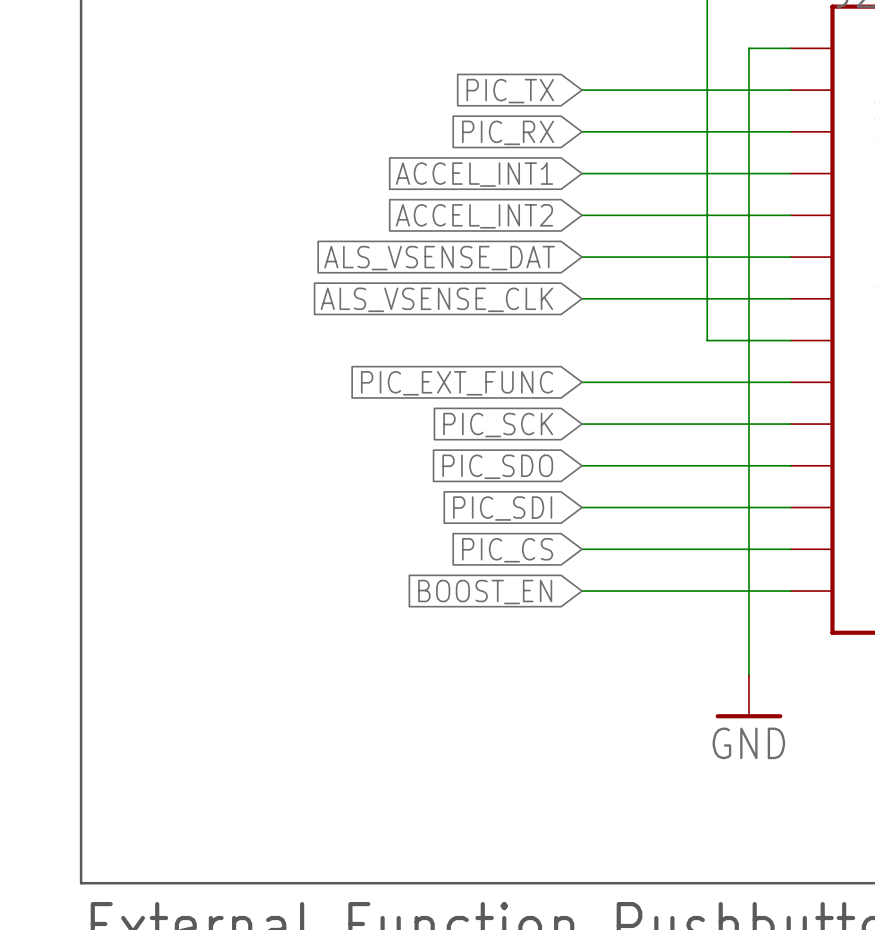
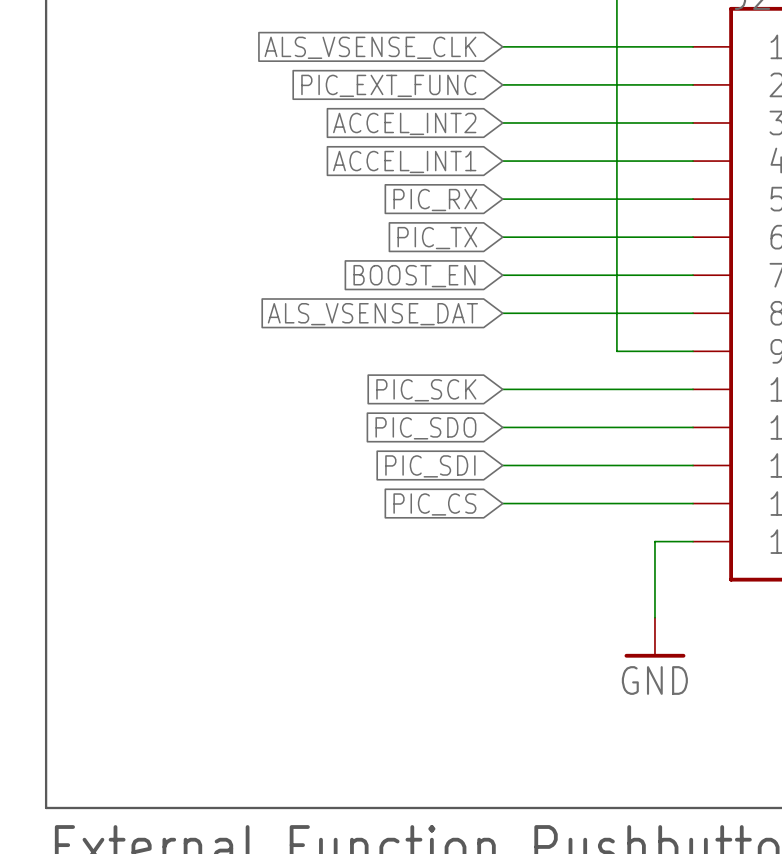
wire: (748, 48) (748, 591) (582, 591) -> (654, 46) (502, 46)
global label: none -> ALS_VSENSE_CLK (370, 47)
global label: PIC_TX (510, 91) -> PIC_EXT_FUNC (388, 85)
global label: PIC_RX (508, 132) -> ACCEL_INT2 (404, 123)
global label: ACCEL_INT2 (474, 216) -> PIC_RX (435, 200)
global label: ALS_VSENSE_DAT (439, 258) -> PIC_TX (437, 238)
global label: ALS_VSENSE_CLK (436, 299) -> BOOST_EN (414, 276)
global label: none -> ALS_VSENSE_DAT (372, 314)
wire: (582, 382) (707, 382) -> (502, 313) (616, 313) (616, 351)
global label: PIC_EXT_FUNC (457, 383) -> none
global label: BOOST_EN (485, 592) -> none

